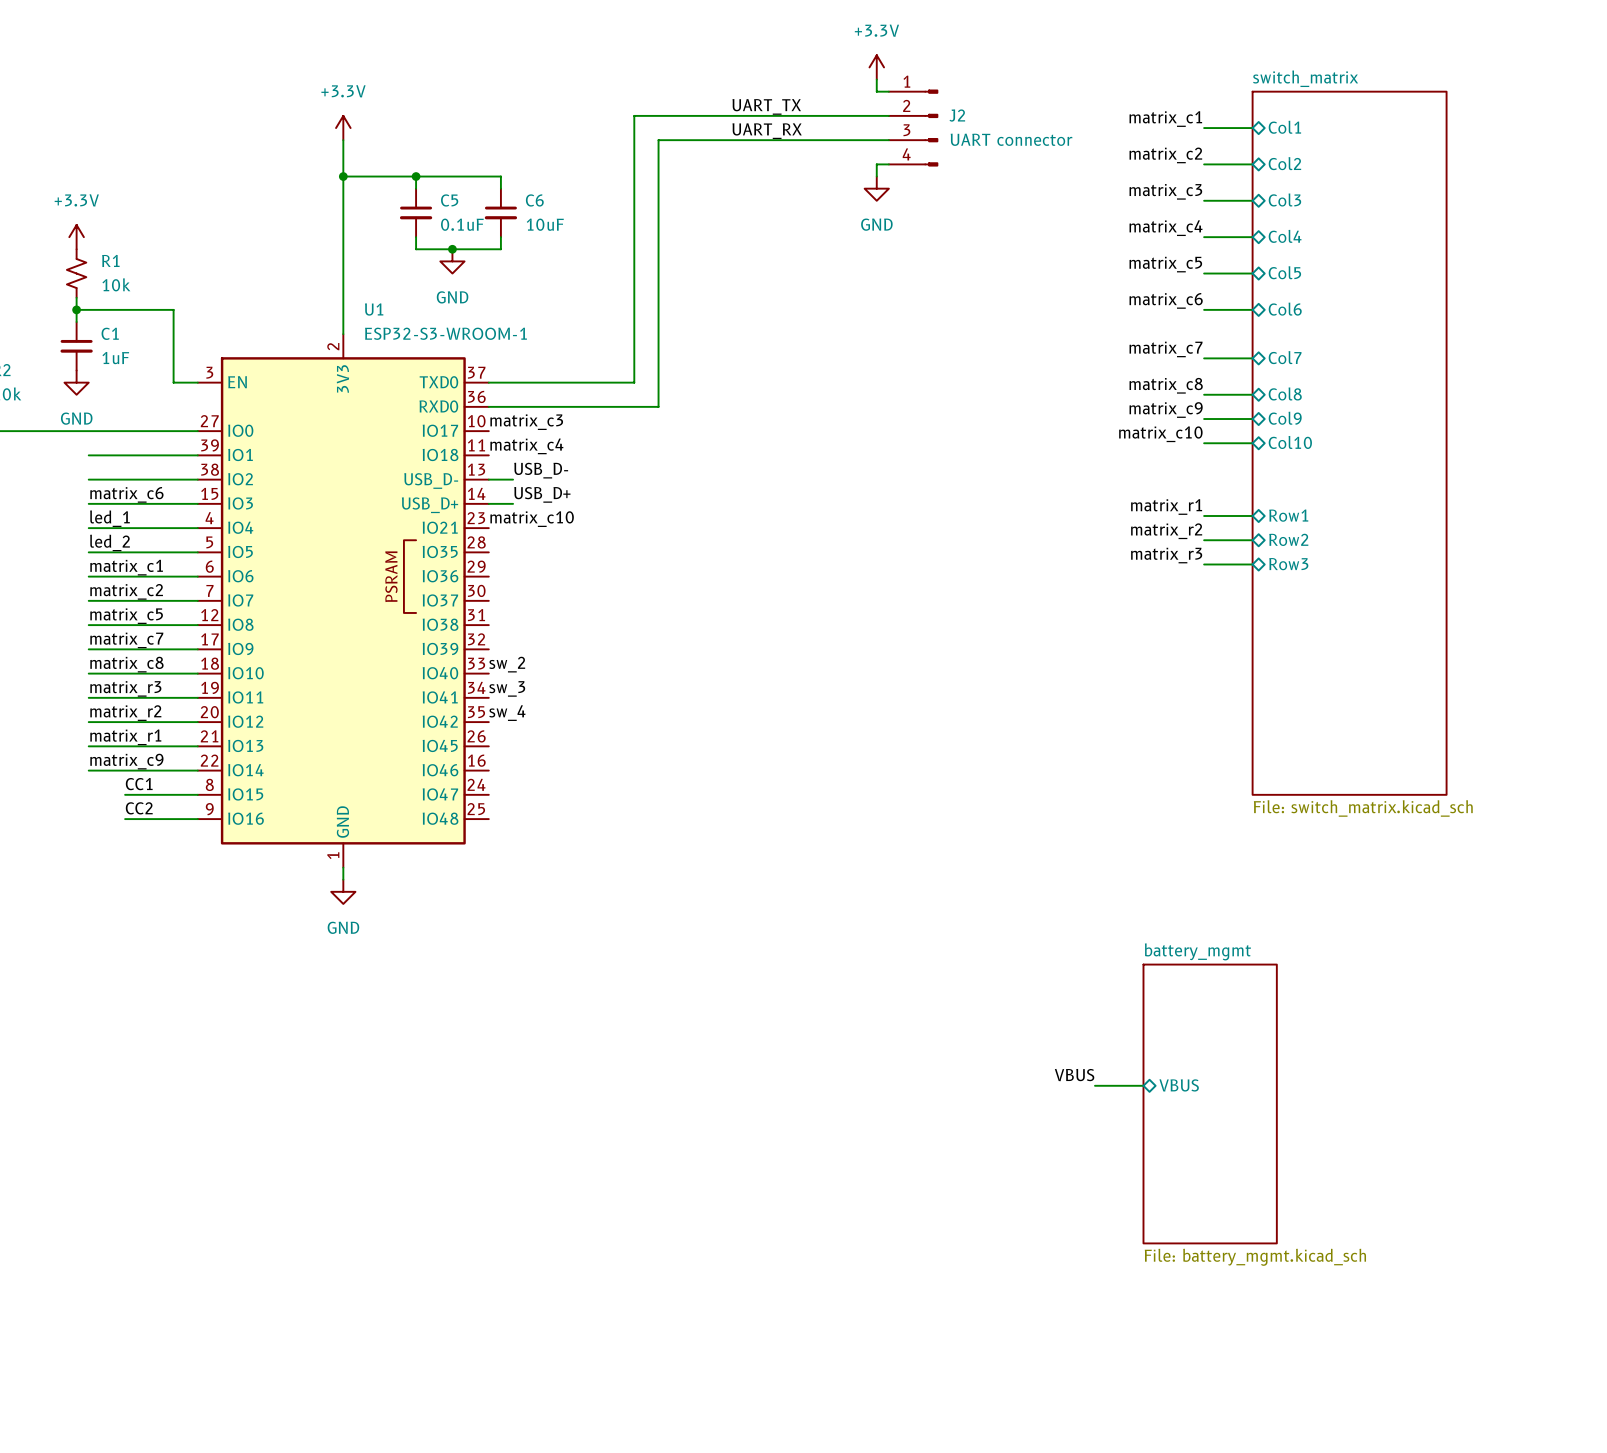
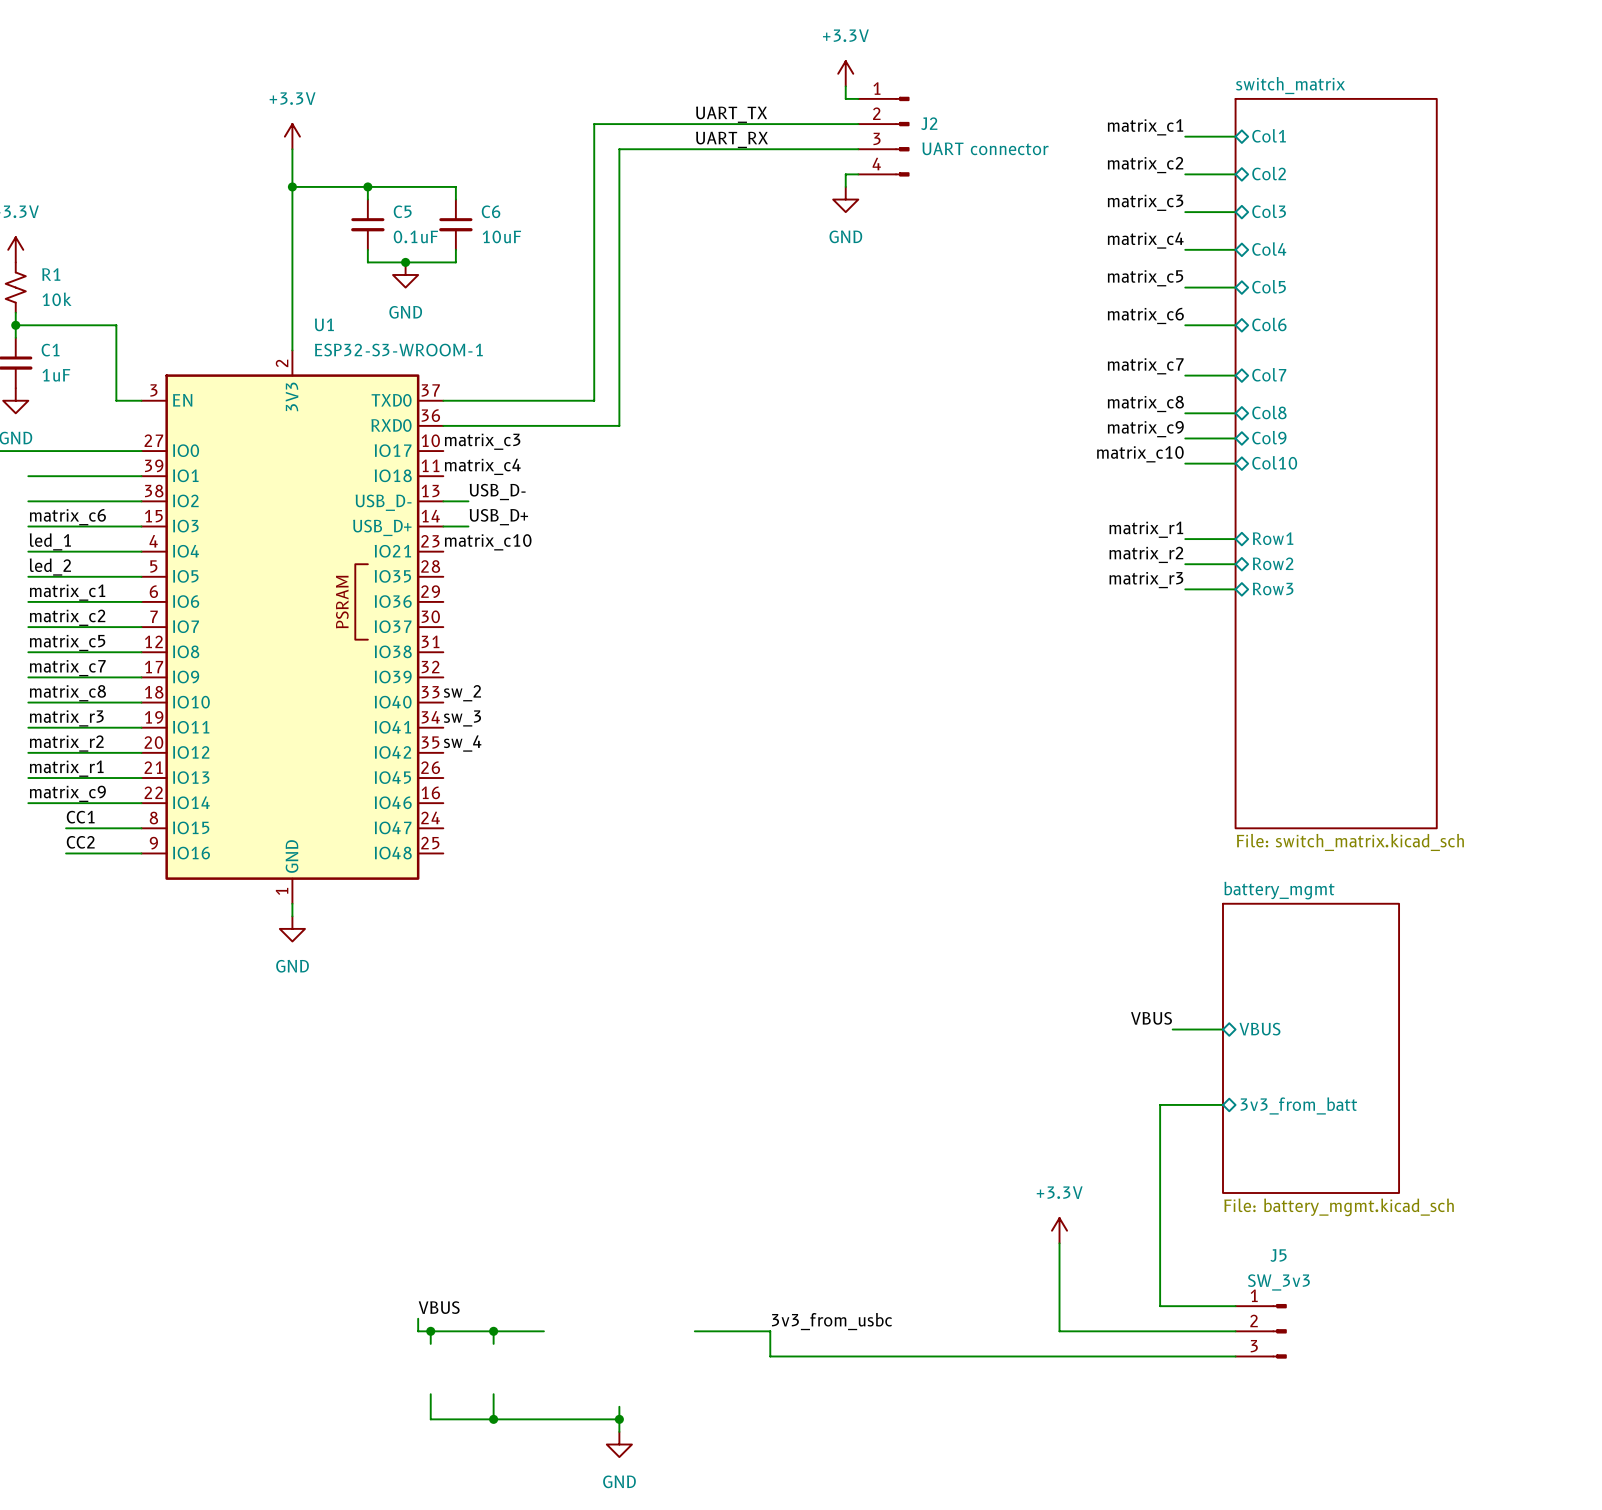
sheet battery_mgmt: none -> File: battery_mgmt.kicad_sch (1311, 1048)
wire: none -> (1222, 1104) (1160, 1104) (1160, 1306) (1235, 1306)
sheet pin: none -> 3v3_from_batt (1298, 1105)
label position: VBUS (1074, 1075) -> VBUS (1151, 1018)
wire: (1094, 1085) (1143, 1085) -> (1172, 1029) (1222, 1029)
sheet pin position: VBUS (1179, 1085) -> VBUS (1259, 1029)
sheet battery_mgmt: File: battery_mgmt.kicad_sch (1210, 1103) -> none
power symbol: none -> +3.3V (1059, 1230)
wire: none -> (1059, 1243) (1059, 1331) (1235, 1331)
label: none -> VBUS (439, 1307)
wire: none -> (418, 1318) (418, 1331) (543, 1331)
label: none -> 3v3_from_usbc (831, 1321)
wire: none -> (430, 1331) (430, 1343)
junction: none -> (430, 1331)
wire: none -> (493, 1331) (493, 1343)
junction: none -> (493, 1331)
wire: none -> (694, 1331) (770, 1331) (770, 1356) (1235, 1356)
J5: none -> SW_3v3 (1261, 1331)
wire: none -> (430, 1394) (430, 1419) (619, 1419)
wire: none -> (493, 1394) (493, 1419)
wire: none -> (619, 1406) (619, 1431)
junction: none -> (493, 1419)
junction: none -> (619, 1419)
power symbol: none -> GND (619, 1444)

